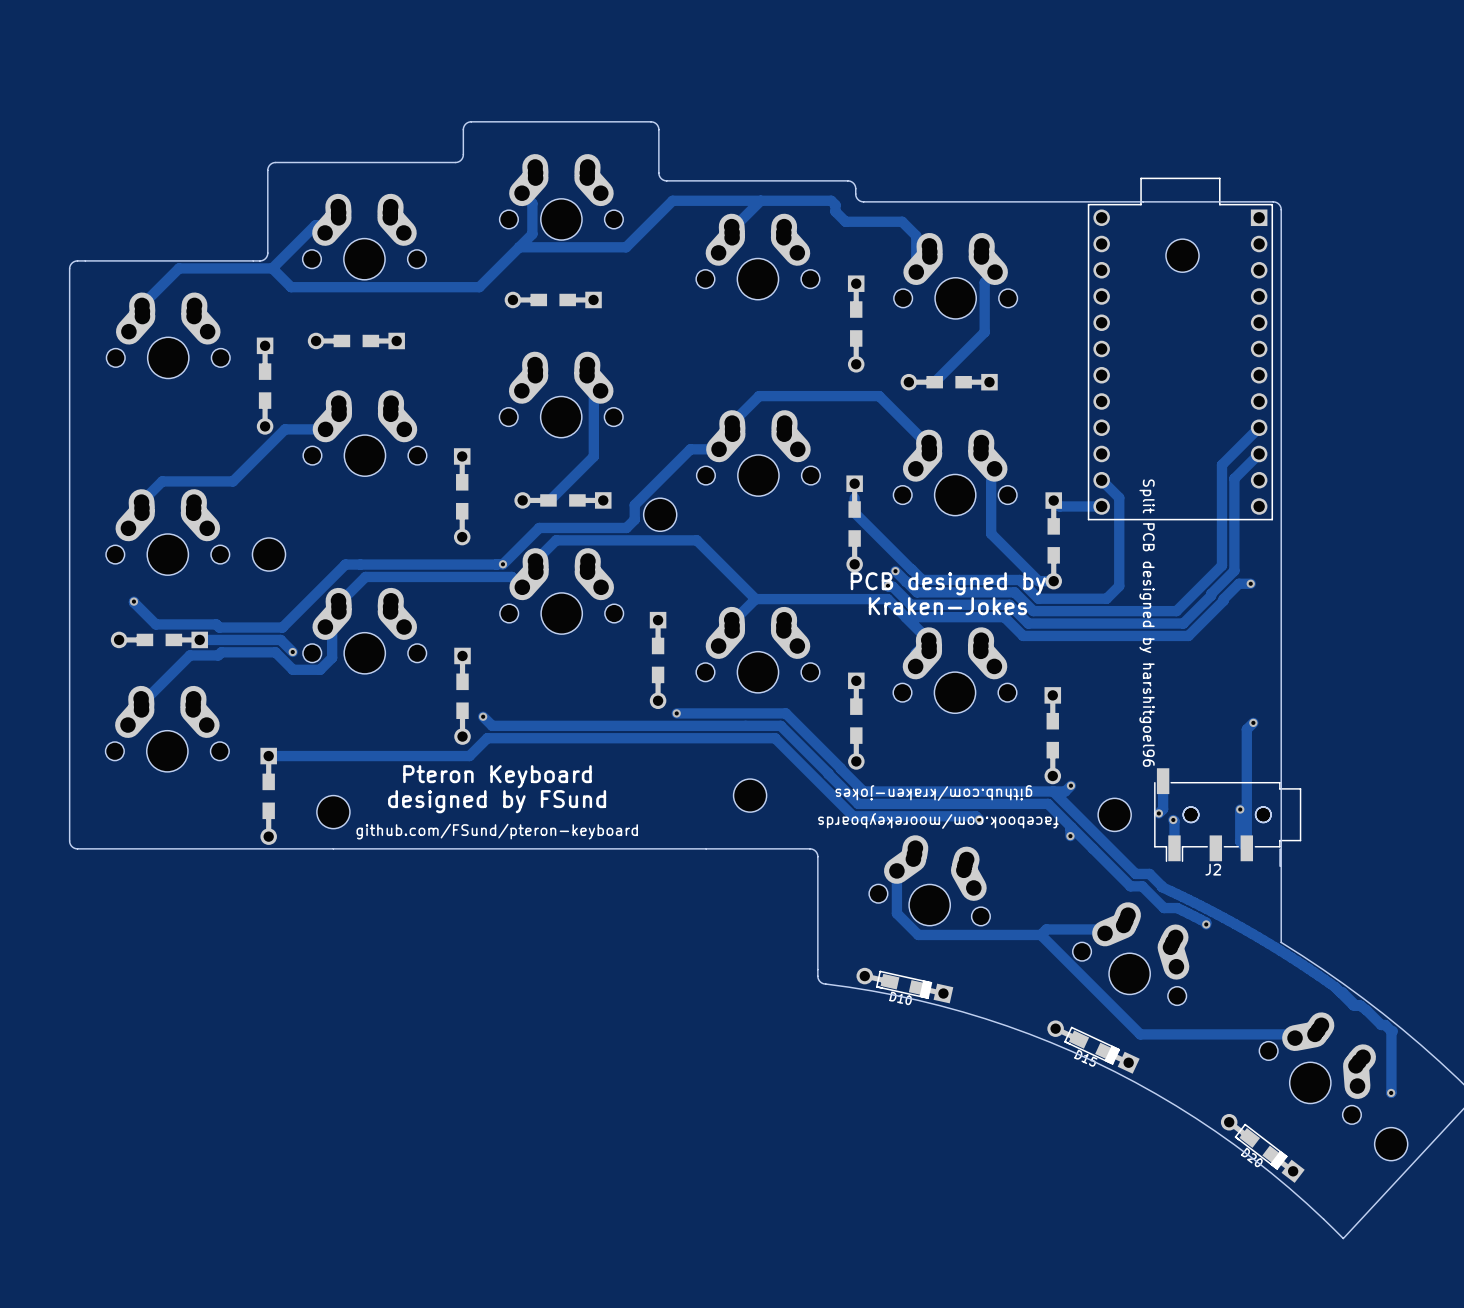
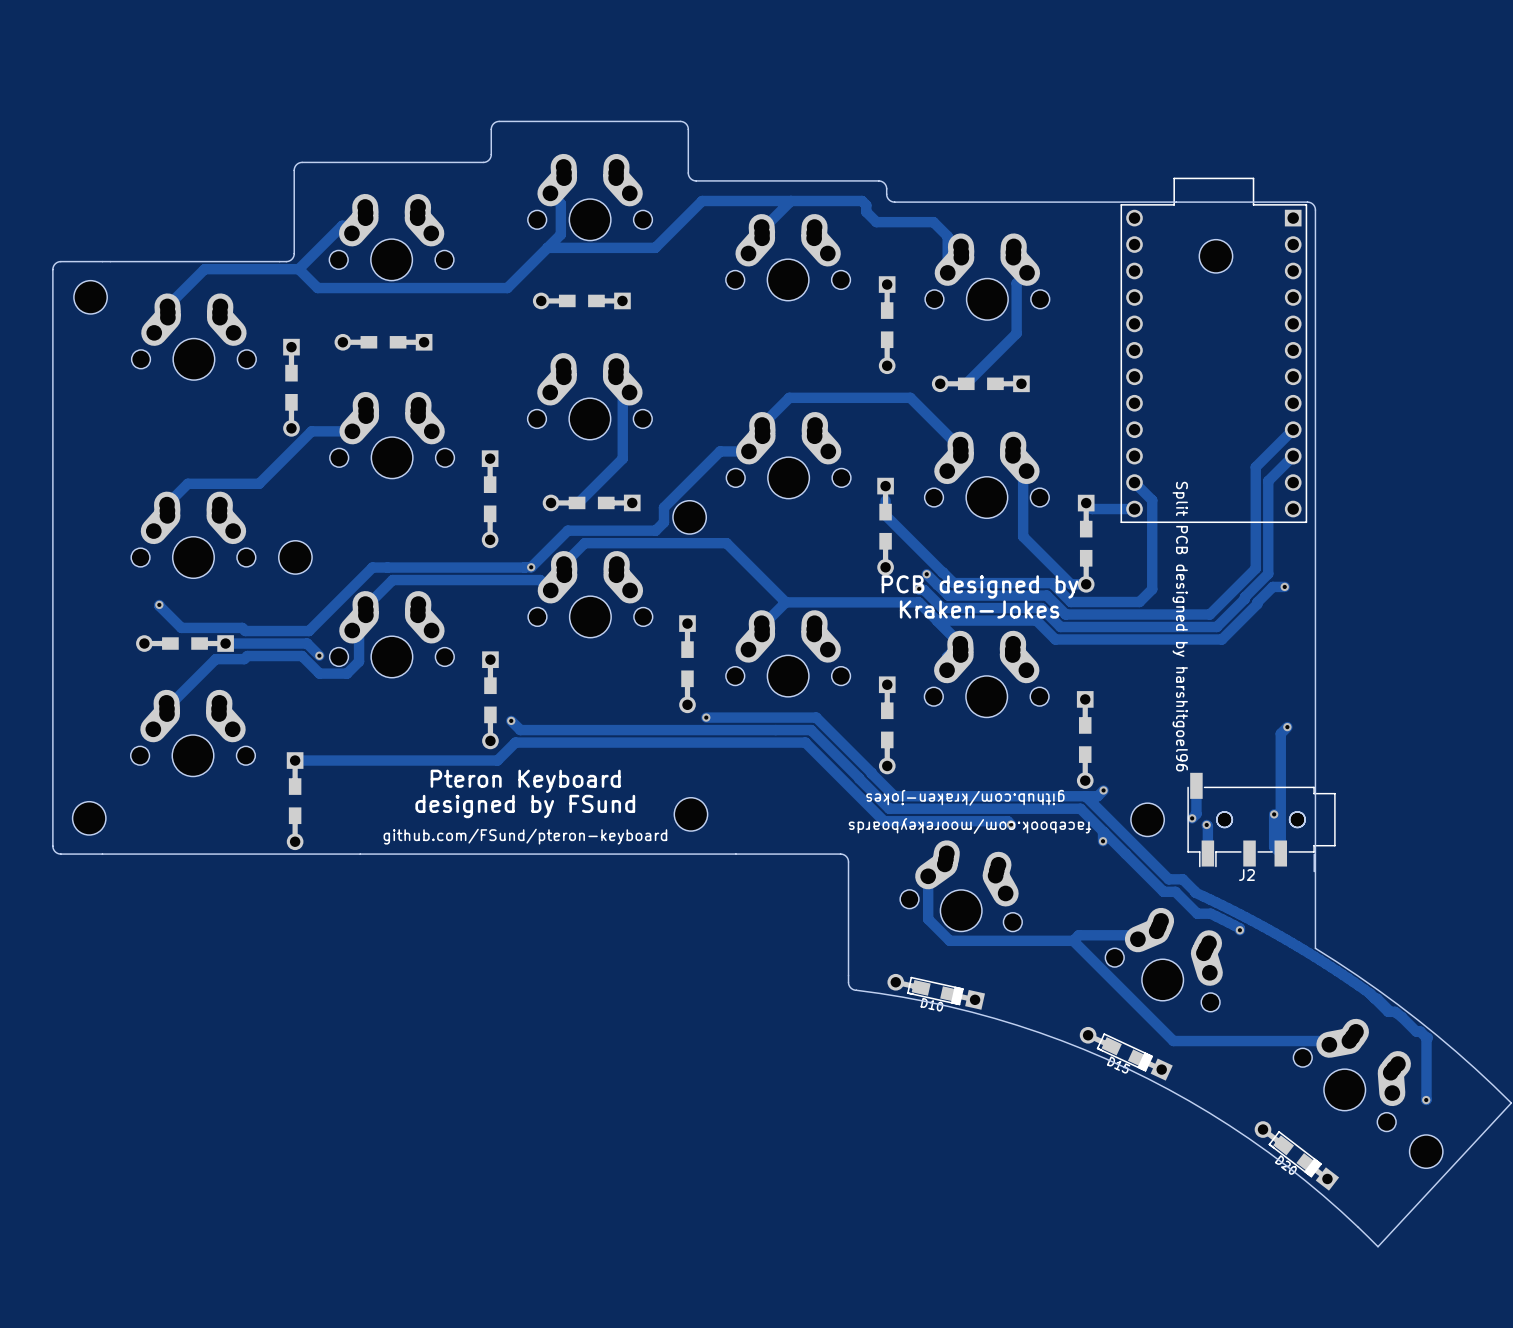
board edge: (77, 260) (71, 263) (69, 268) (69, 840) (71, 846) (77, 848) -> (102, 261) (59, 261) (55, 263) (52, 269) (52, 847) (55, 851) (59, 853) (102, 854)
part: none -> (90, 297)
part position: (750, 795) -> (690, 814)
part: (333, 812) -> none
part: none -> (89, 818)

